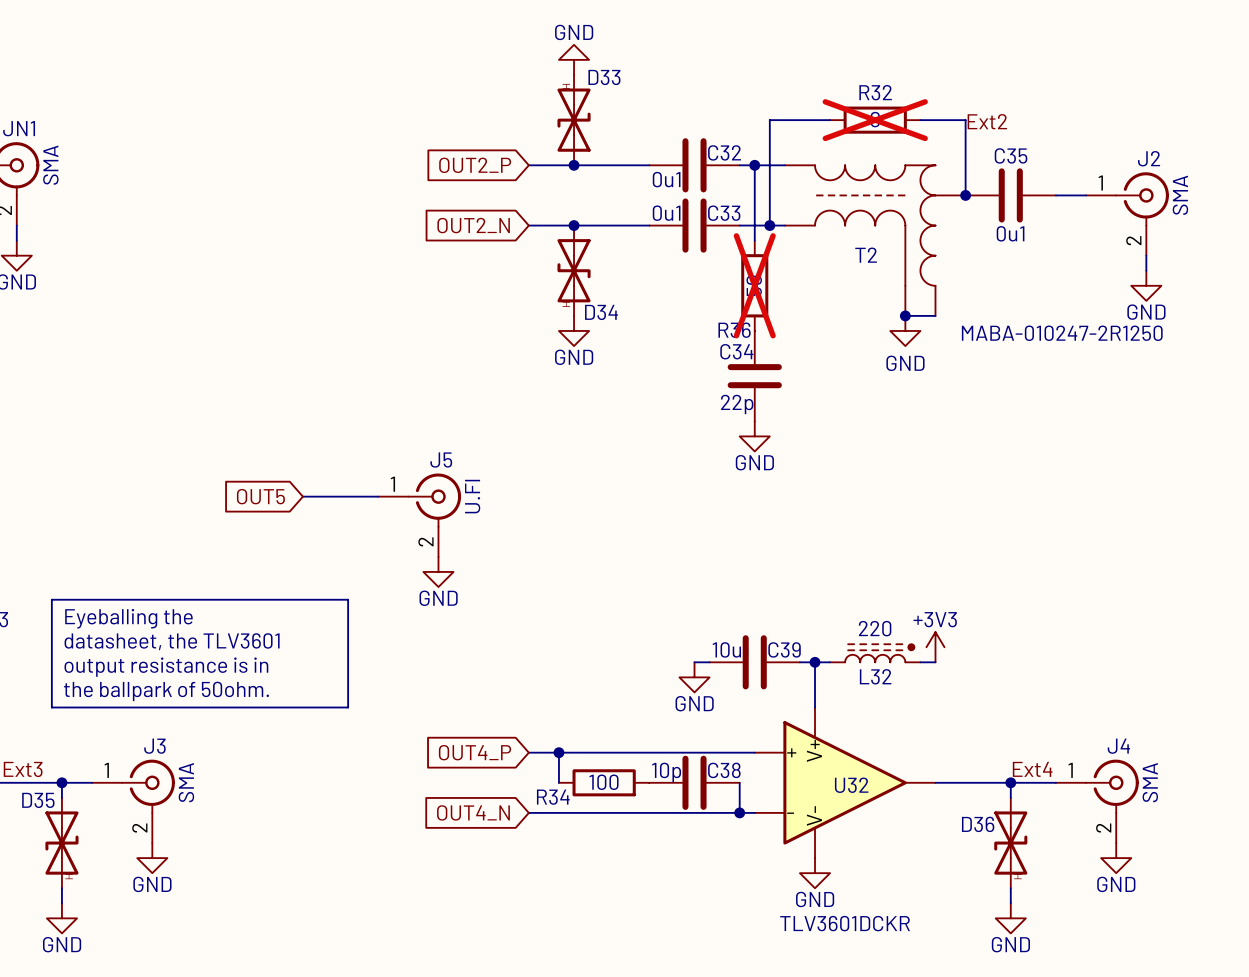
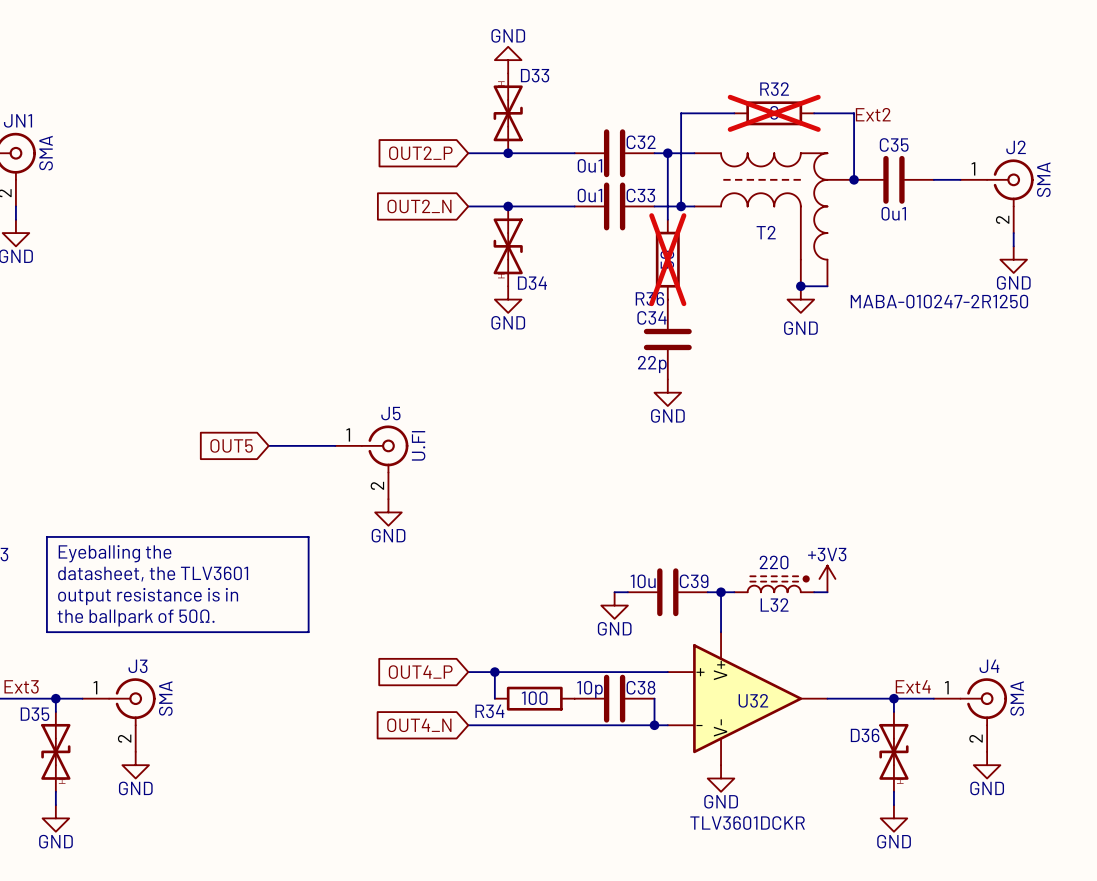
text: the ballpark of 50ohm. (166, 691) -> the ballpark of 50Ω. (136, 617)

